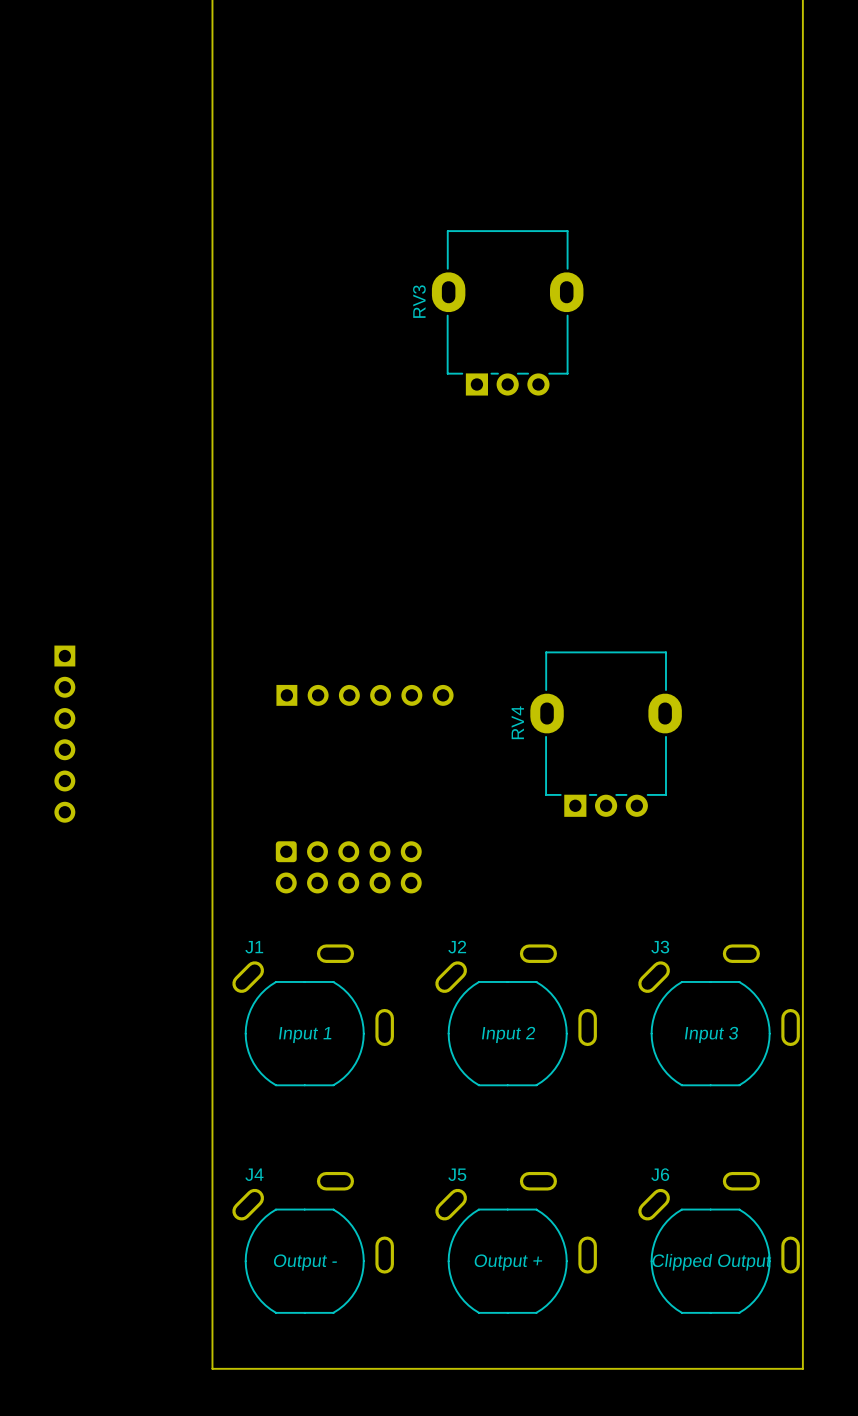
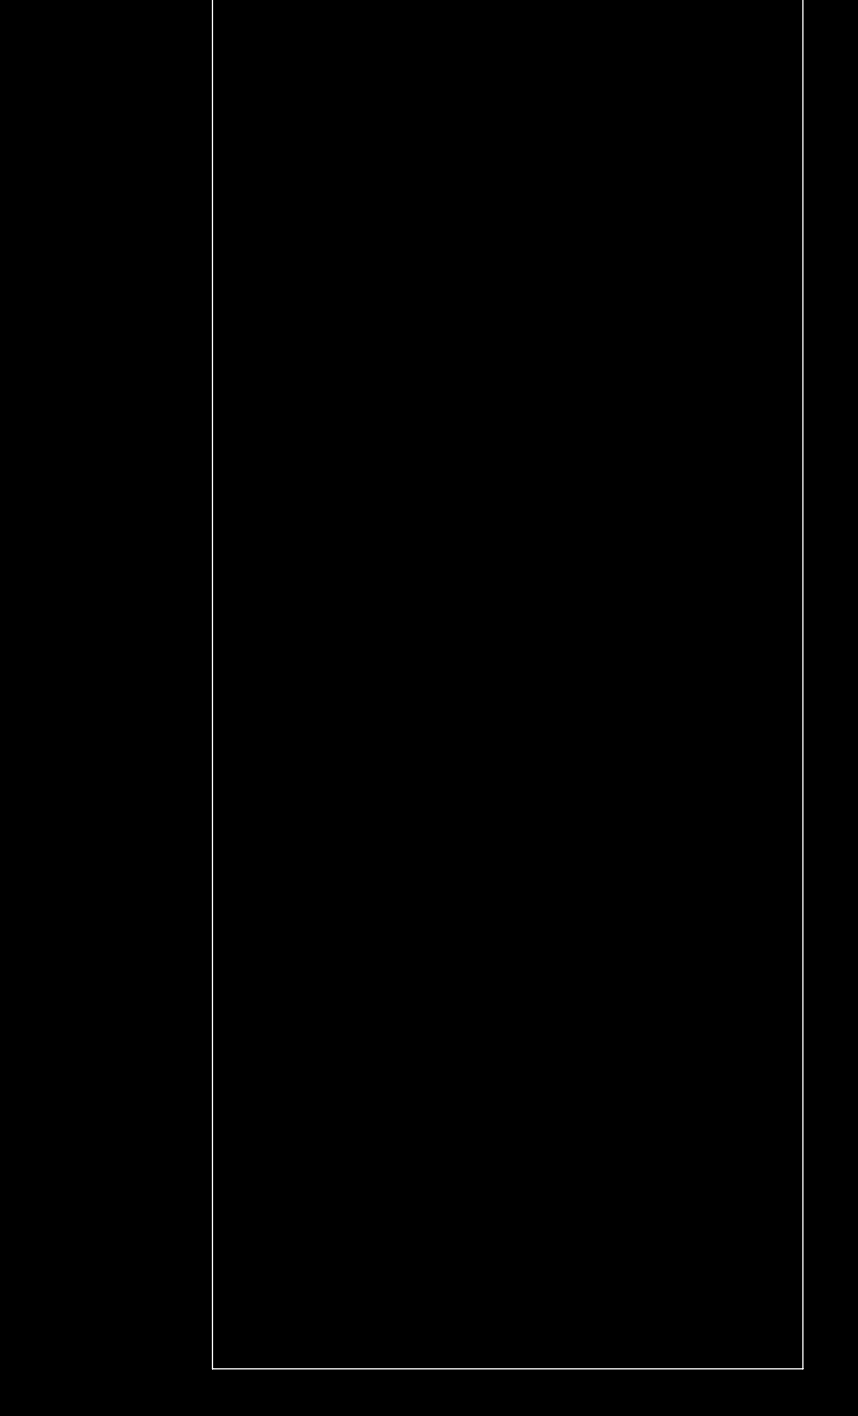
RV3: (507, 312) -> none
part: (364, 695) -> none
part: (64, 734) -> none
RV4: (606, 734) -> none
part: (348, 867) -> none
J1: (313, 1015) -> none
J2: (516, 1015) -> none
J3: (719, 1015) -> none
J4: (313, 1242) -> none
J5: (516, 1242) -> none
J6: (719, 1242) -> none

